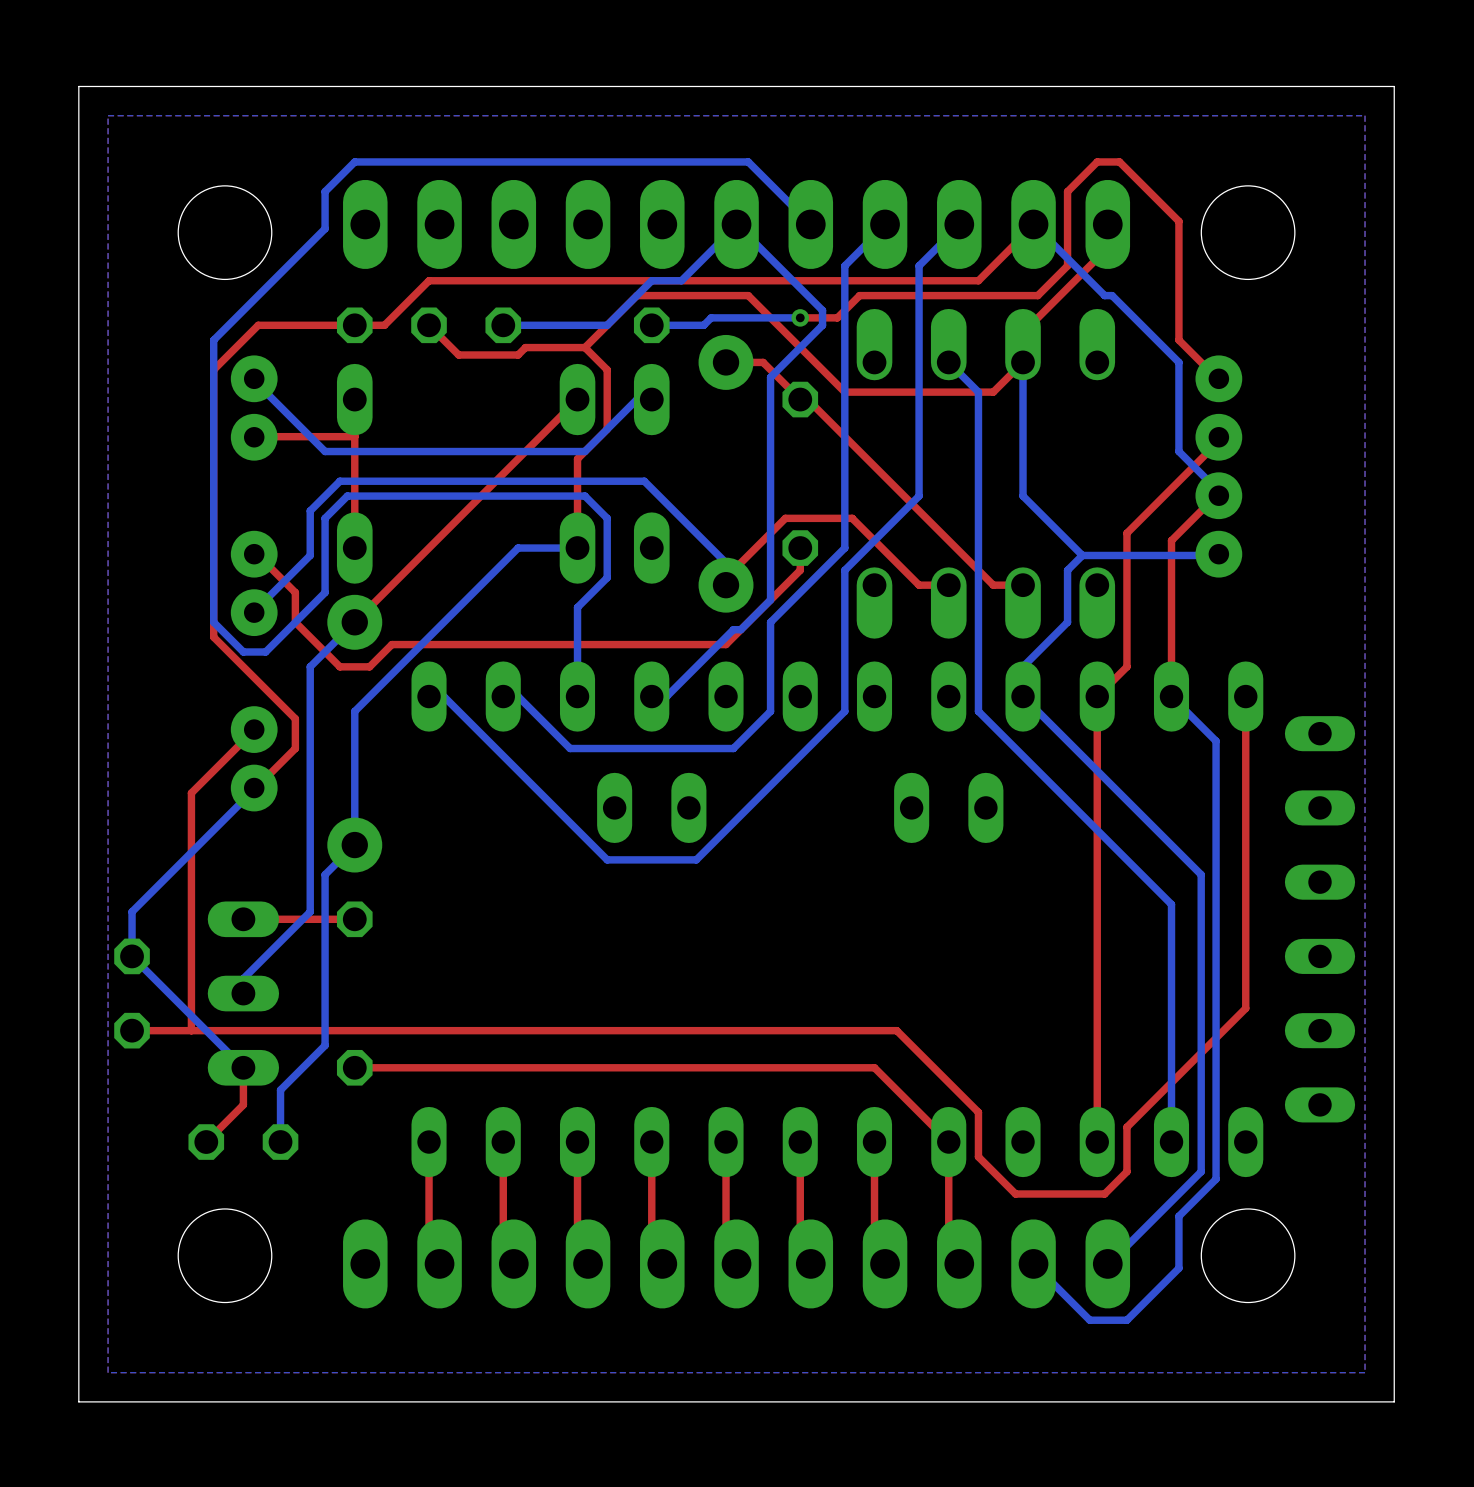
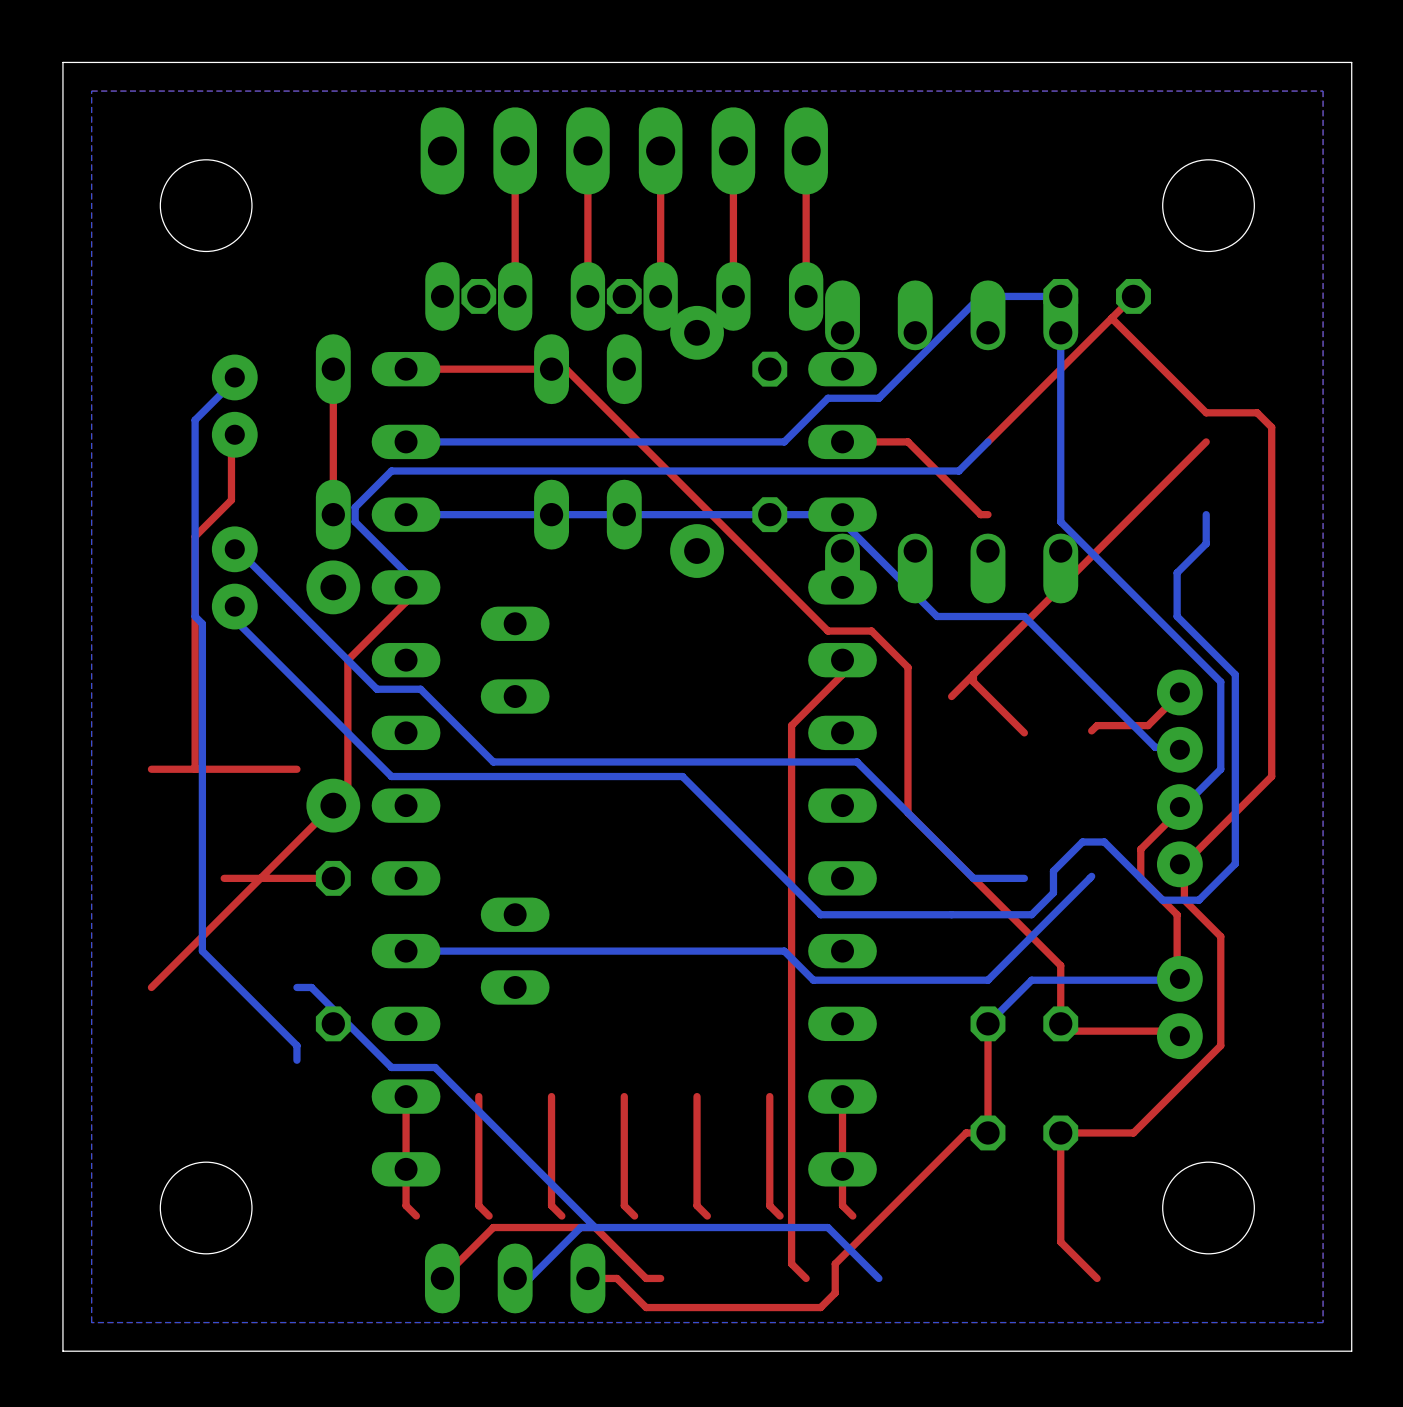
top track: none -> (515, 150) (515, 296)
top track: none -> (587, 150) (587, 296)
part: none -> (624, 150)
top track: none -> (660, 150) (660, 296)
top track: none -> (733, 150) (733, 296)
top track: none -> (806, 150) (806, 296)
part: (736, 224) -> none
bottom track: (810, 224) (748, 161) (354, 161) (325, 191) (325, 228) (213, 340) (213, 451) -> (234, 377) (231, 383) (195, 420)
bottom track: (885, 224) (844, 265) (844, 548) (770, 622) (770, 711) (733, 748) (570, 748) (518, 696) (503, 696) -> none
bottom track: (959, 224) (919, 265) (919, 496) (844, 570) (844, 711) (696, 859) (607, 859) (443, 696) (429, 696) -> none
top track: (1033, 224) (978, 280) (429, 280) (384, 325) (258, 325) (213, 369) (213, 570) -> (234, 434) (231, 441) (231, 500) (195, 536)
bottom track: (1033, 224) (1104, 295) (1112, 295) (1178, 362) (1178, 451) (1216, 488) (1218, 495) -> none
top track: (1107, 224) (1104, 228) (1104, 251) (1023, 332) (1023, 362) (993, 392) (844, 392) (748, 295) (636, 295) (584, 347) -> none
top track: (800, 317) (837, 317) (859, 295) (1037, 295) (1067, 265) (1067, 191) (1097, 161) (1119, 161) (1178, 221) (1178, 340) (1218, 378) -> none
bottom track: (800, 317) (711, 317) (703, 325) (651, 325) -> none
via: (800, 317) -> none
part: (391, 325) -> none
top track: (429, 325) (458, 355) (518, 355) (525, 347) (584, 347) -> none
bottom track: (503, 325) (607, 325) (651, 280) (681, 280) (736, 224) (822, 310) (822, 325) (770, 377) (770, 600) (740, 629) (733, 629) (666, 696) (651, 696) -> none
part: none -> (1097, 296)
top track: none -> (1133, 296) (988, 441)
top track: (584, 347) (607, 369) (607, 429) (577, 458) (577, 548) -> none
top track: none -> (1111, 318) (1206, 412) (1257, 412) (1271, 427) (1271, 776) (1184, 863) (1179, 864) (1184, 871) (1184, 900) (1220, 936) (1220, 1045) (1133, 1132) (1060, 1132) (1060, 1242) (1097, 1278)
top track: (726, 362) (763, 362) (800, 399) (807, 399) (993, 585) (1023, 585) -> none
bottom track: (948, 362) (978, 392) (978, 711) (1171, 904) (1171, 1142) -> none
bottom track: (1023, 362) (1023, 496) (1082, 555) -> none
bottom track: (254, 378) (325, 451) (584, 451) (636, 399) (651, 399) -> none
top track: (577, 399) (354, 622) -> none
part position: (254, 408) -> (234, 406)
top track: (354, 436) (254, 437) -> none
top track: (1218, 437) (1216, 444) (1126, 533) (1126, 666) (1097, 696) (1097, 1008) -> (406, 369) (566, 369) (827, 631) (871, 631) (907, 667) (907, 812) (1060, 965)
part position: (1218, 466) -> (1179, 778)
bottom track: none -> (406, 441) (784, 441) (827, 398) (878, 398) (980, 296) (1060, 296) (1060, 521) (1220, 681) (1220, 769) (1184, 805) (1179, 807)
top track: none -> (842, 441) (907, 441) (980, 514) (988, 514)
bottom track: none -> (988, 441) (958, 471) (391, 471) (355, 507) (355, 521) (406, 572) (406, 587)
top track: none -> (1206, 441) (951, 696)
top track: (1218, 495) (1216, 496) (1171, 540) (1171, 696) -> none
bottom track: (518, 548) (354, 711) (354, 845) (325, 874) (325, 1045) (280, 1090) (280, 1142) -> (493, 514) (406, 514)
top track: (800, 548) (800, 570) (726, 644) (391, 644) (369, 666) (339, 666) (295, 622) (295, 592) (258, 555) (254, 554) -> none
bottom track: none -> (835, 514) (937, 616) (1024, 616) (1155, 747) (1177, 747) (1179, 749)
bottom track: none -> (842, 514) (551, 514)
bottom track: none -> (1206, 514) (1206, 543) (1177, 572) (1177, 616) (1235, 674) (1235, 863) (1198, 900) (1162, 900) (1104, 841) (1082, 841) (1053, 871) (1053, 892) (1031, 914) (820, 914) (682, 776) (391, 776) (238, 623) (238, 609) (234, 606)
bottom track: (1218, 554) (1082, 555) -> none
bottom track: (1082, 555) (1067, 570) (1067, 622) (1023, 666) (1023, 696) (1201, 874) (1201, 1171) (1107, 1263) -> none
bottom track: none -> (234, 549) (238, 551) (376, 689) (420, 689) (493, 761) (857, 761) (973, 878) (1024, 878)
part position: (254, 583) -> (234, 577)
bottom track: (726, 585) (726, 562) (644, 481) (339, 481) (310, 510) (310, 555) (254, 612) -> none
top track: (948, 585) (919, 585) (852, 518) (785, 518) (726, 577) (726, 585) -> none
bottom track: (213, 622) (243, 651) (265, 651) (325, 592) (325, 518) (347, 496) (584, 496) (607, 518) (607, 577) (577, 607) (577, 696) -> (195, 587) (195, 616) (202, 623) (202, 951) (296, 1045) (296, 1060)
bottom track: (354, 622) (310, 666) (310, 911) (243, 978) (243, 993) -> none
top track: none -> (406, 587) (406, 601) (347, 660) (347, 791) (151, 987)
top track: (213, 637) (295, 718) (295, 748) (254, 788) -> (195, 601) (195, 769)
top track: none -> (842, 660) (842, 674) (791, 725) (791, 1263) (806, 1278)
bottom track: (1171, 696) (1216, 741) (1216, 1179) (1178, 1216) (1178, 1268) (1126, 1320) (1089, 1320) (1033, 1263) -> none
top track: (1245, 696) (1245, 1008) (1126, 1127) (1126, 1171) (1104, 1194) (1015, 1194) (978, 1156) (978, 1112) (896, 1030) (132, 1030) -> none
top track: none -> (973, 674) (973, 681) (1024, 732)
top track: (254, 729) (191, 793) (191, 1030) -> none
top track: none -> (1179, 692) (1148, 725) (1097, 725) (1091, 730)
part: (254, 758) -> none
bottom track: (254, 788) (132, 911) (132, 956) (243, 1067) -> none
top track: none -> (296, 769) (151, 769)
top track: none -> (1179, 807) (1177, 812) (1140, 849) (1140, 878) (1177, 914) (1177, 972) (1179, 978)
bottom track: none -> (1091, 876) (988, 980) (813, 980) (784, 951) (406, 951)
part rotation: 0° (883, 919) -> 90° counterclockwise (624, 724)
part: (132, 993) -> none
part rotation: 0° (243, 993) -> 90° clockwise (515, 1278)
part position: (243, 993) -> (515, 1278)
bottom track: none -> (1179, 978) (1031, 980) (988, 1023)
bottom track: none -> (296, 987) (311, 987) (391, 1067) (435, 1067) (595, 1227)
part: none -> (1179, 1007)
top track: (243, 1067) (243, 1104) (206, 1142) -> none
top track: (354, 1067) (874, 1067) (948, 1142) (948, 1253) (959, 1263) -> none
top track: none -> (988, 1023) (988, 1132) (966, 1132) (835, 1263) (835, 1293) (820, 1307) (646, 1307) (617, 1278) (587, 1278)
part: none -> (1024, 1023)
top track: (1097, 1067) (1097, 1142) -> (1060, 1023) (1068, 1031) (1177, 1031) (1179, 1036)
part: (243, 1142) -> none
part: none -> (1024, 1132)
part: (736, 1263) -> none
top track: none -> (660, 1278) (646, 1278) (595, 1227) (493, 1227) (442, 1278)
bottom track: none -> (878, 1278) (827, 1227) (580, 1227) (529, 1278) (515, 1278)

